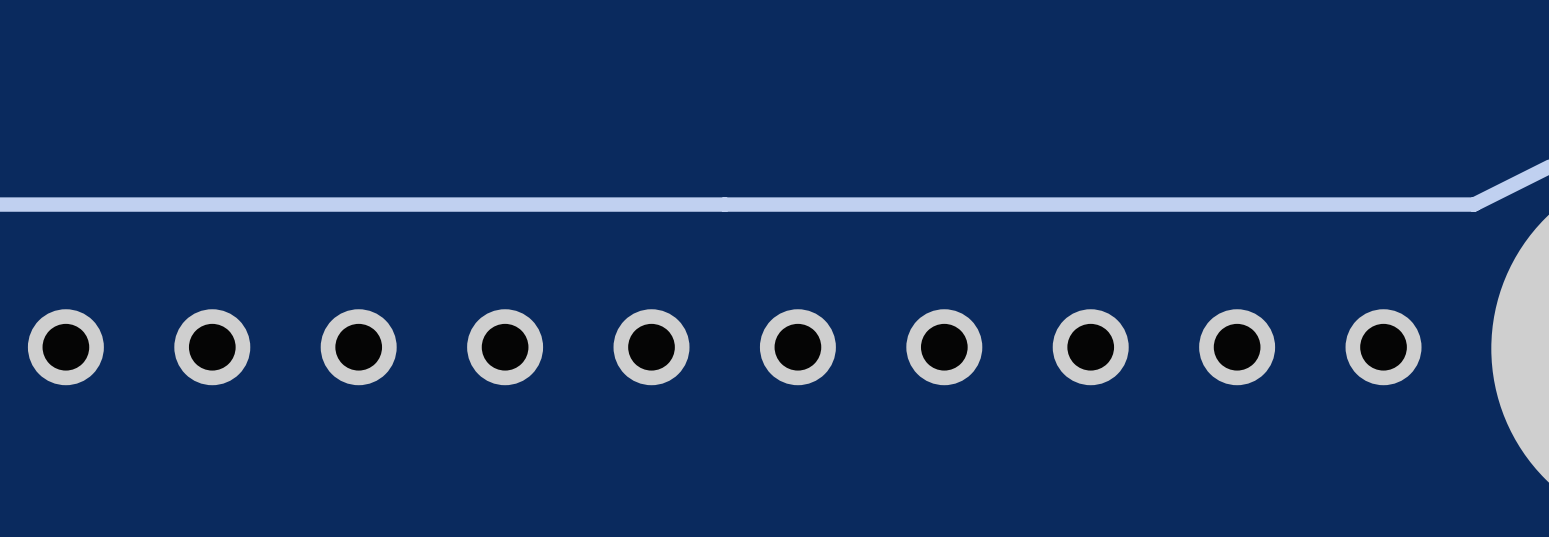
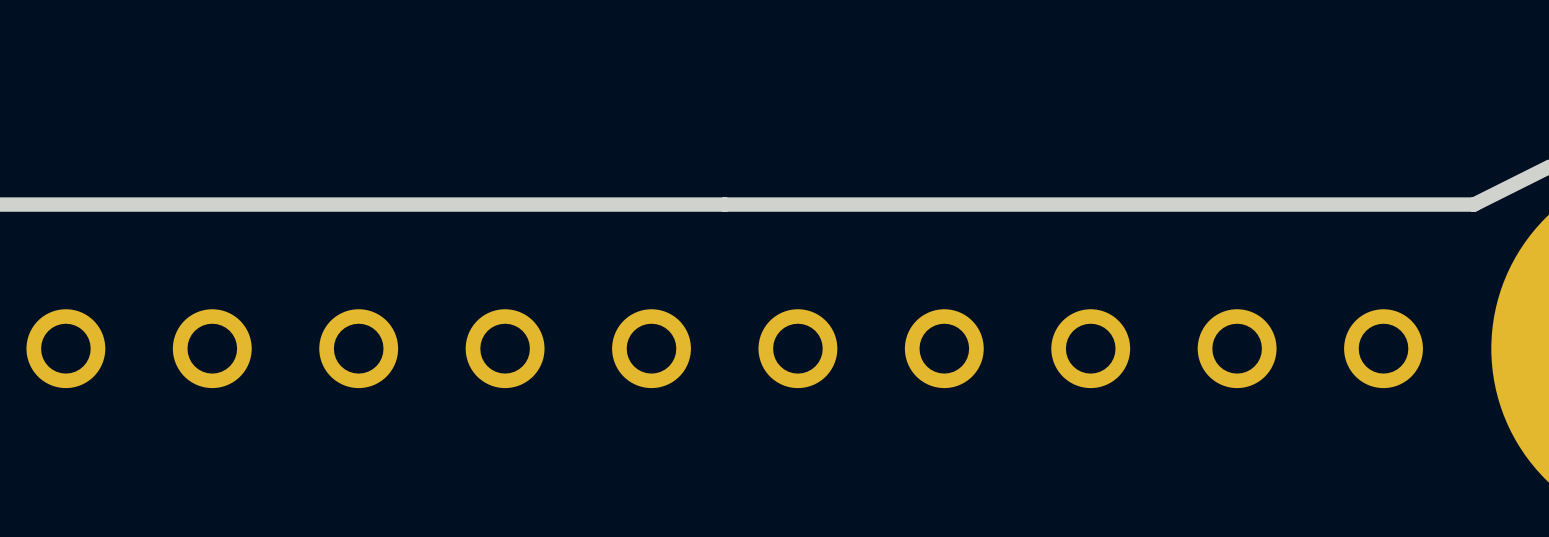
part footprint: [27, 309, 1422, 386] -> [26, 309, 1423, 389]

